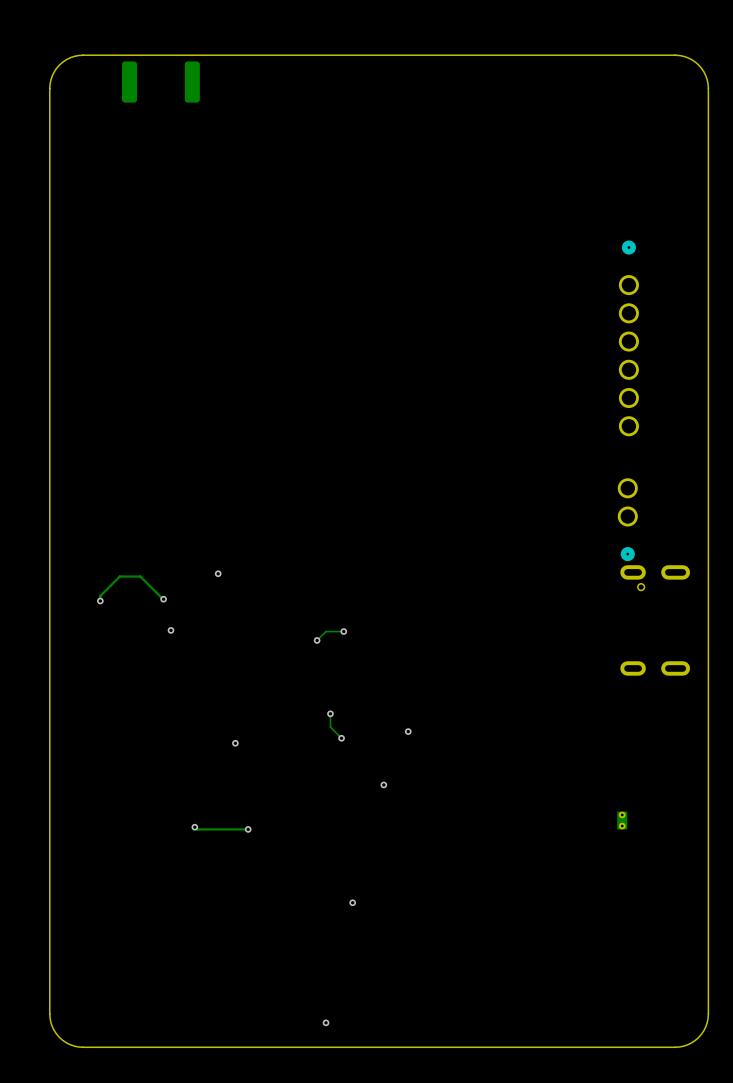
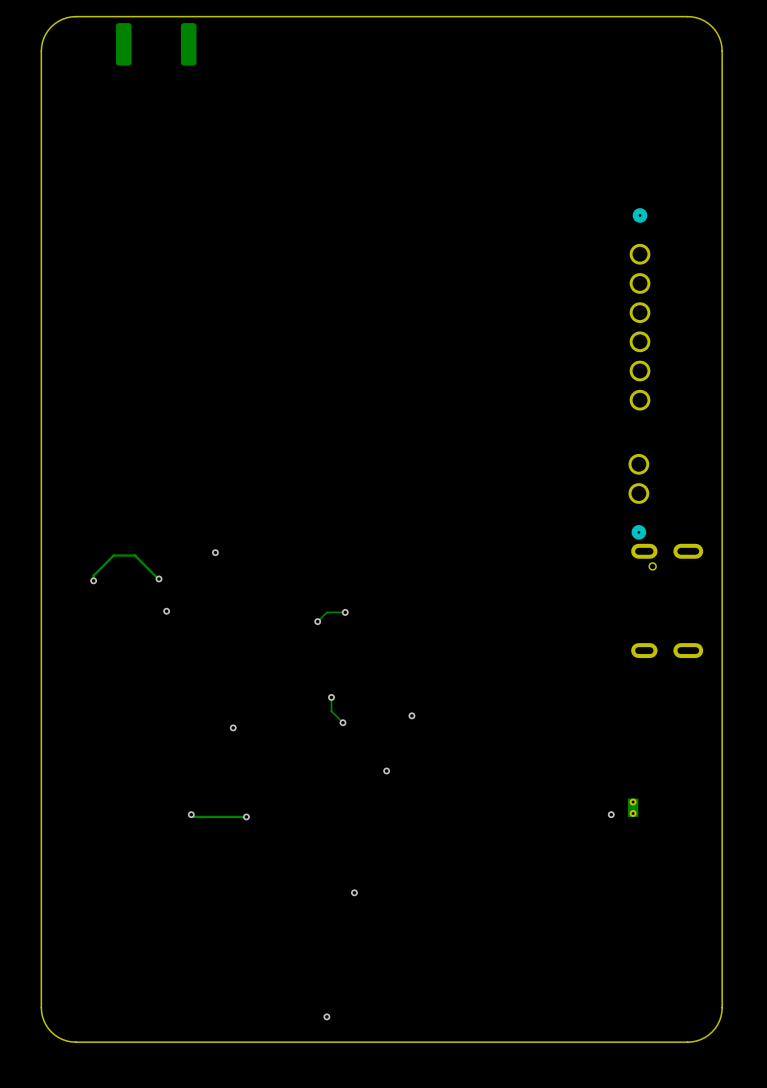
via: none -> (611, 814)

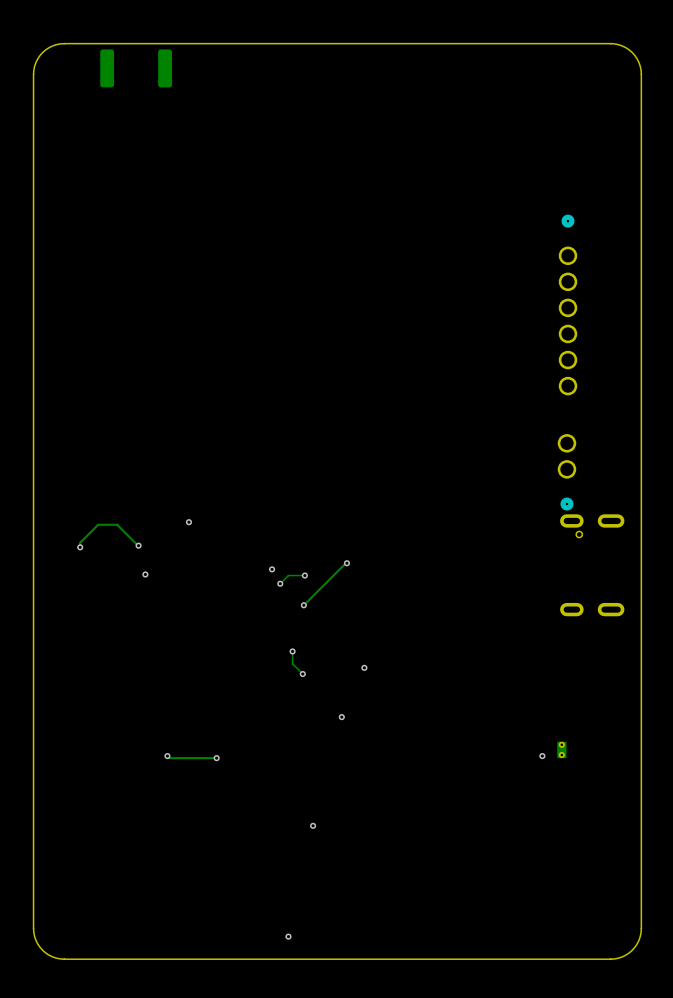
track: none -> (346, 563) (303, 605)
via: none -> (346, 563)
via: none -> (272, 569)
via: none -> (303, 605)
via: (233, 727) -> none

